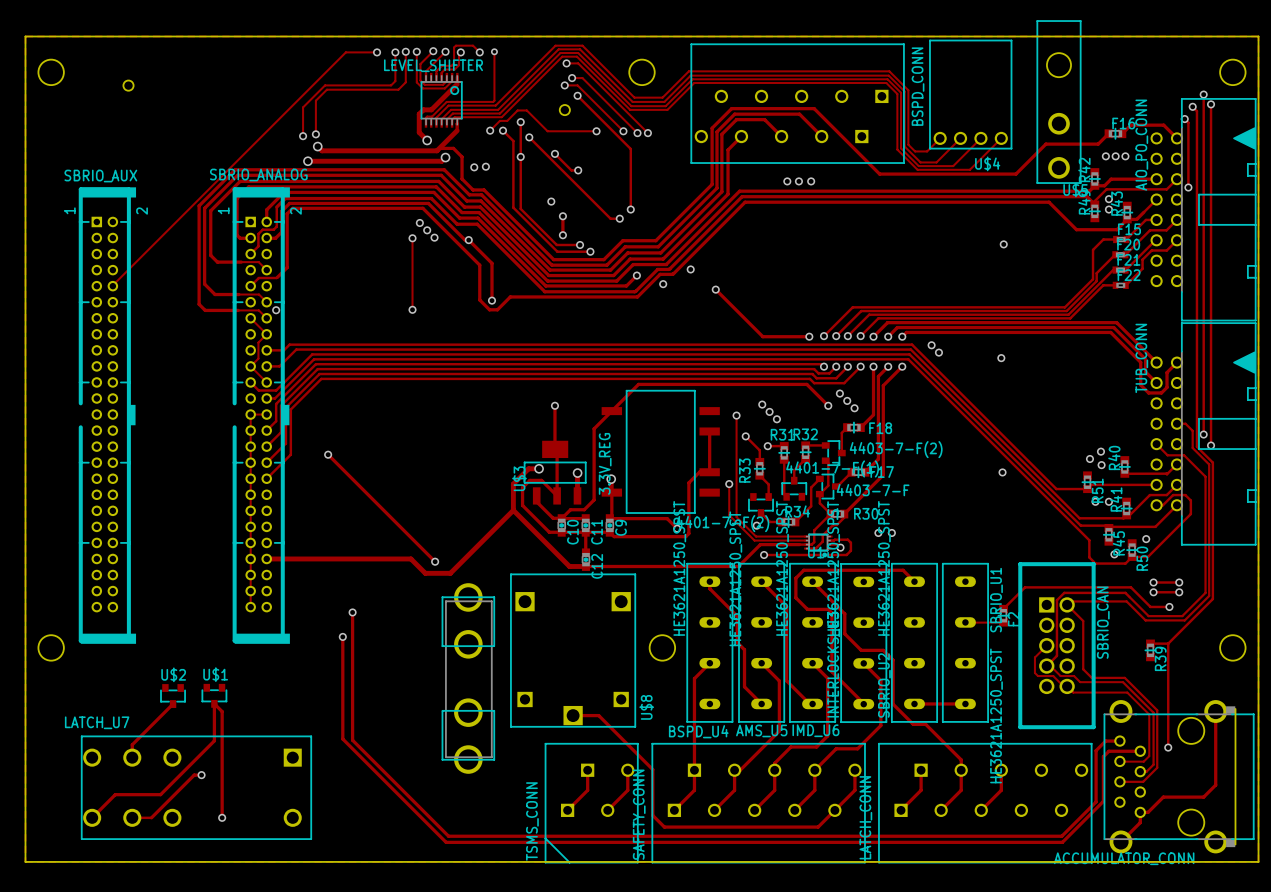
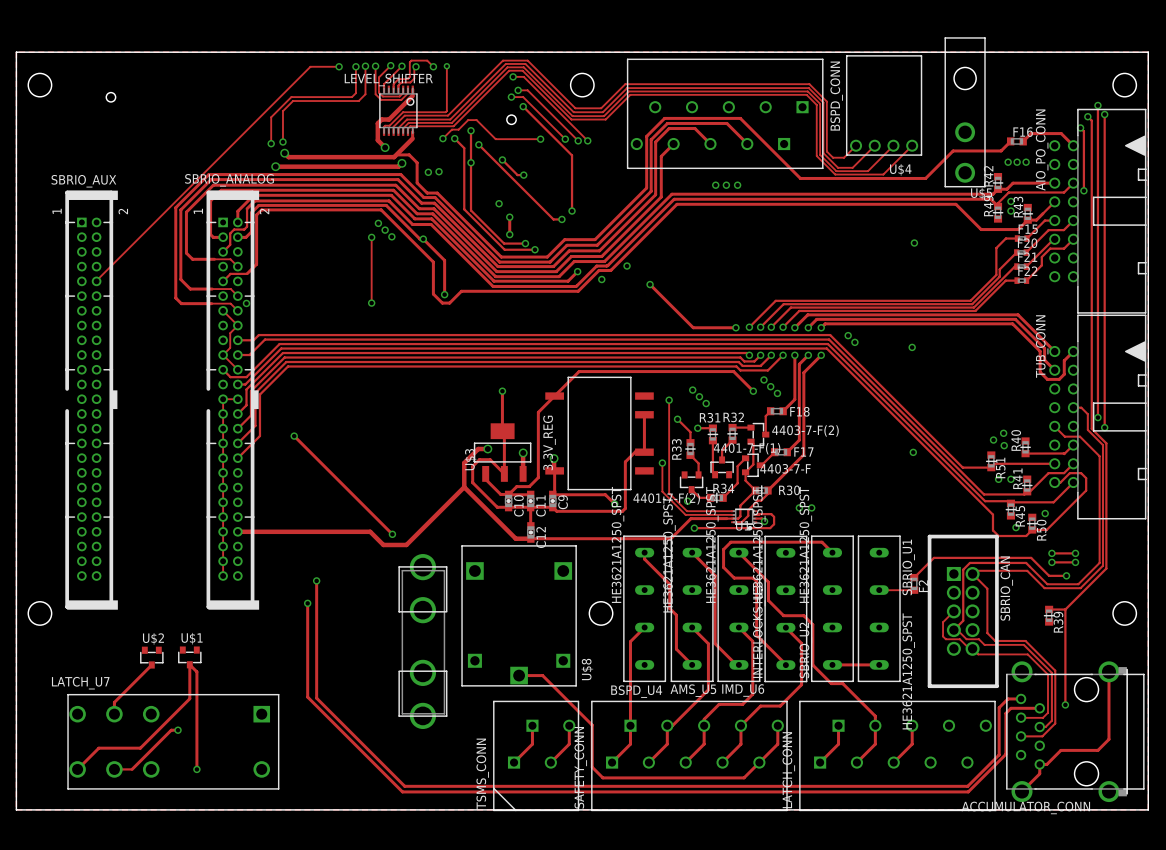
F16 footprint: [1104, 128, 1127, 140] -> [1006, 137, 1027, 146]
F18 footprint: [843, 422, 865, 434] -> [766, 407, 787, 416]
F17 footprint: [847, 466, 870, 478] -> [771, 448, 791, 457]
F2 footprint: [997, 604, 1010, 627] -> [910, 573, 919, 594]

